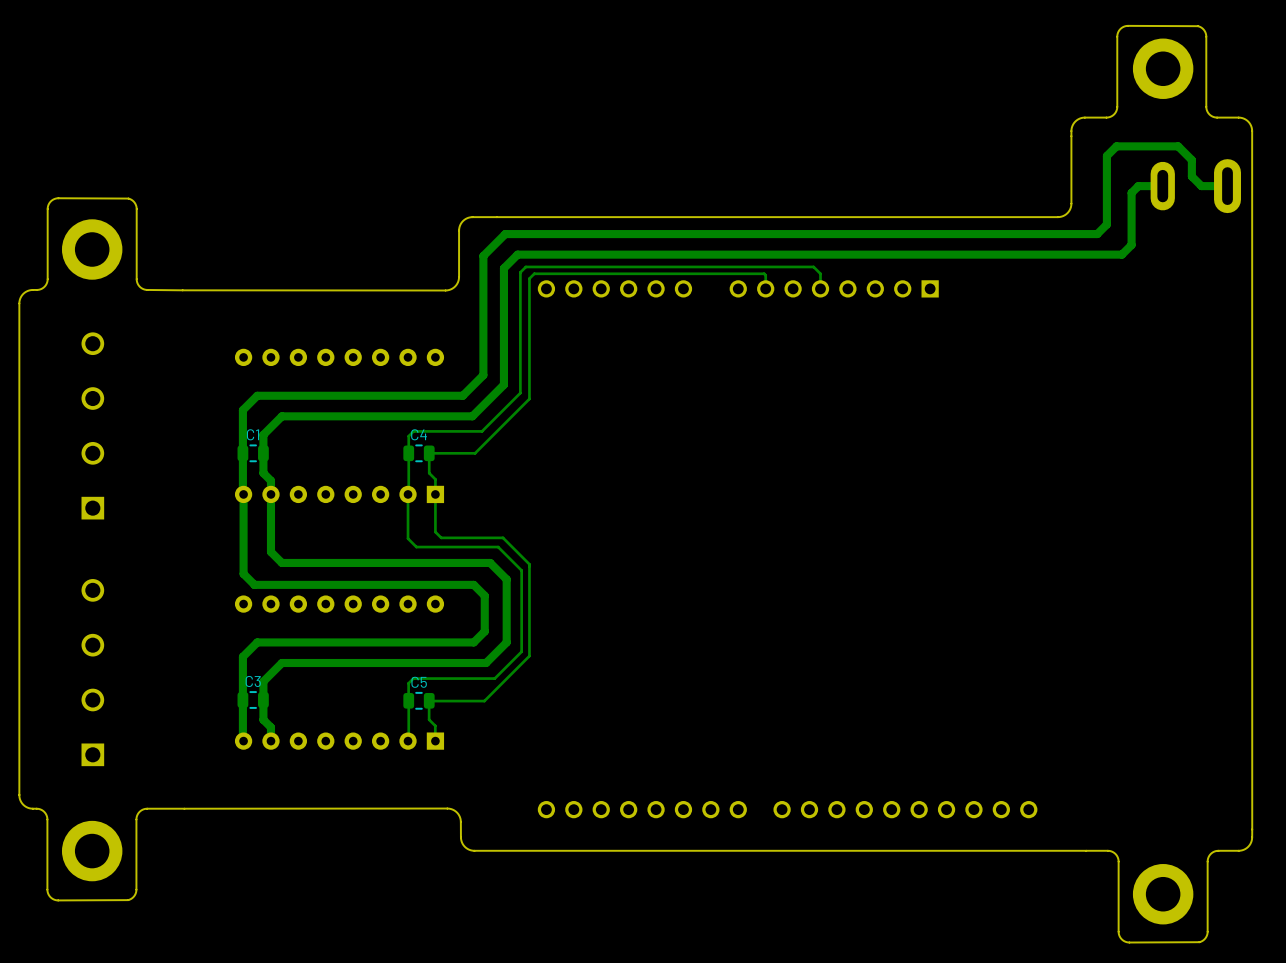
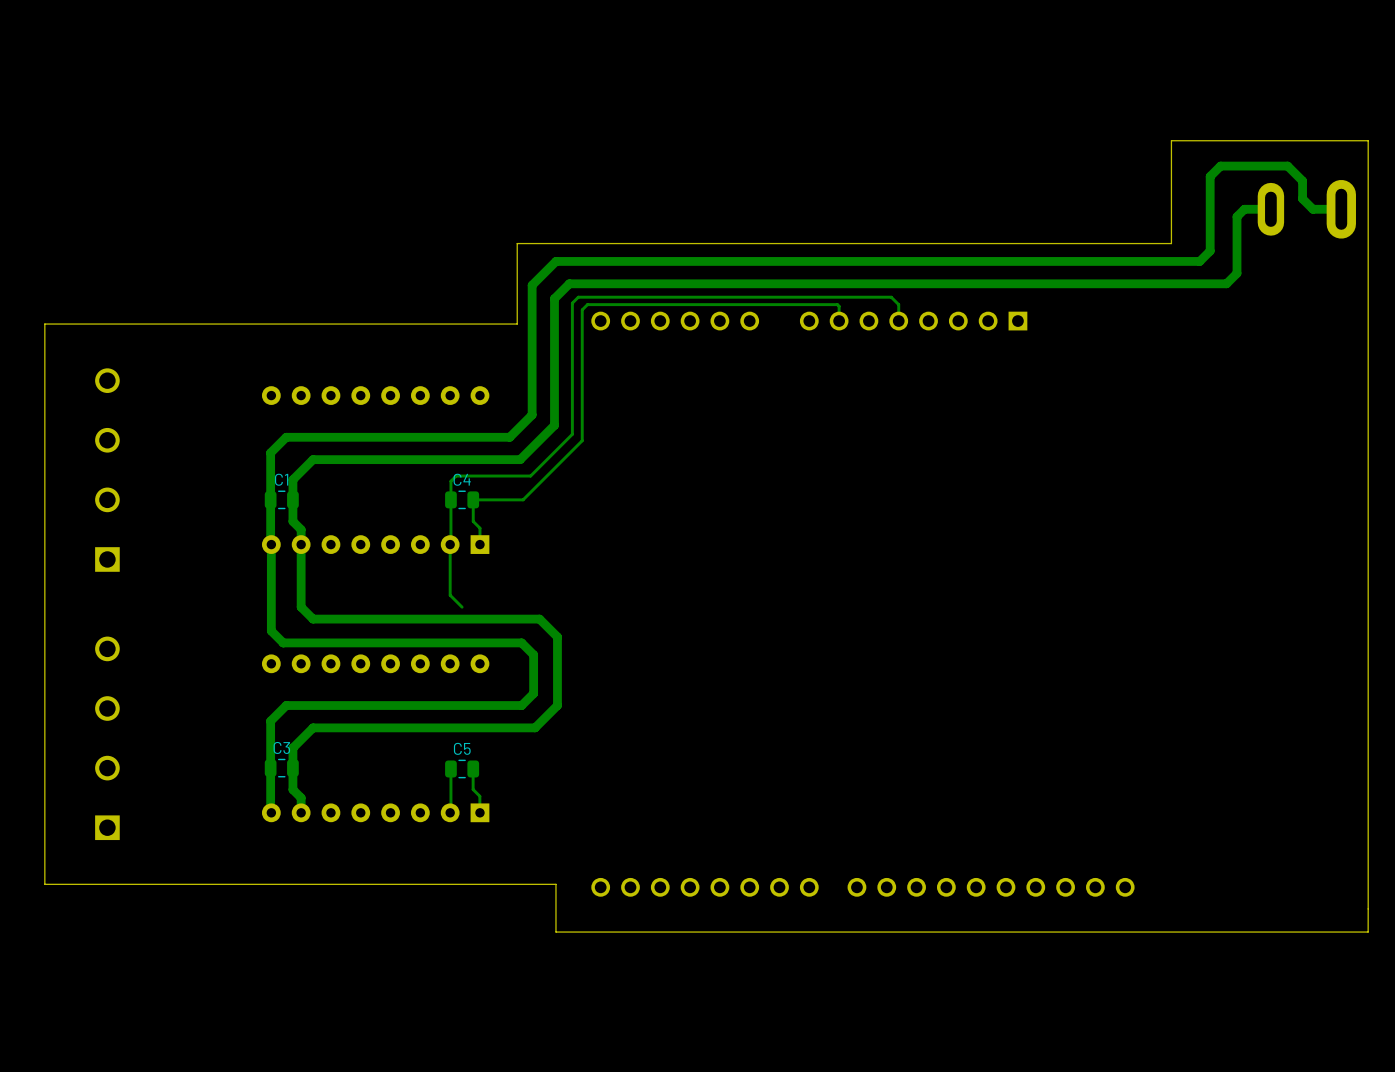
part: (1163, 68) -> none
part: (92, 249) -> none
track: (435, 494) (435, 532) (441, 537) (503, 537) (529, 564) (529, 656) (484, 701) (429, 701) -> none
track: (408, 538) (416, 547) (498, 547) (521, 570) (521, 651) (494, 678) (413, 678) (408, 683) (408, 700) -> (450, 592) (450, 595) (462, 607)
board edge: (1218, 850) (1211, 853) (1207, 860) (1207, 931) (1204, 939) (1199, 942) (1129, 942) (1122, 940) (1118, 934) (1118, 860) (1114, 853) (1107, 850) -> (1331, 932) (1211, 932)
board edge: (1238, 850) (1248, 846) (1252, 837) (1252, 129) (1249, 122) (1243, 118) (1214, 117) (1207, 110) (1206, 35) (1202, 28) (1198, 26) (1128, 25) (1120, 29) (1117, 35) (1115, 112) (1107, 117) (1081, 118) (1072, 125) (1071, 205) (1067, 213) (1059, 217) (470, 217) (463, 221) (459, 227) (458, 278) (456, 285) (449, 290) (147, 289) (139, 286) (136, 280) (136, 209) (132, 200) (128, 198) (58, 198) (49, 202) (47, 209) (47, 281) (41, 289) (24, 292) (19, 303) (19, 795) (24, 805) (40, 809) (47, 816) (47, 889) (49, 896) (58, 900) (128, 900) (132, 897) (136, 889) (136, 818) (139, 811) (145, 808) (449, 808) (455, 811) (459, 816) (461, 840) (466, 848) (472, 850) (505, 850) -> (1353, 932) (1368, 932) (1368, 140) (1171, 140) (1171, 243) (517, 243) (517, 324) (44, 324) (44, 884) (555, 884) (555, 932)
part: (92, 851) -> none
part: (1163, 894) -> none

